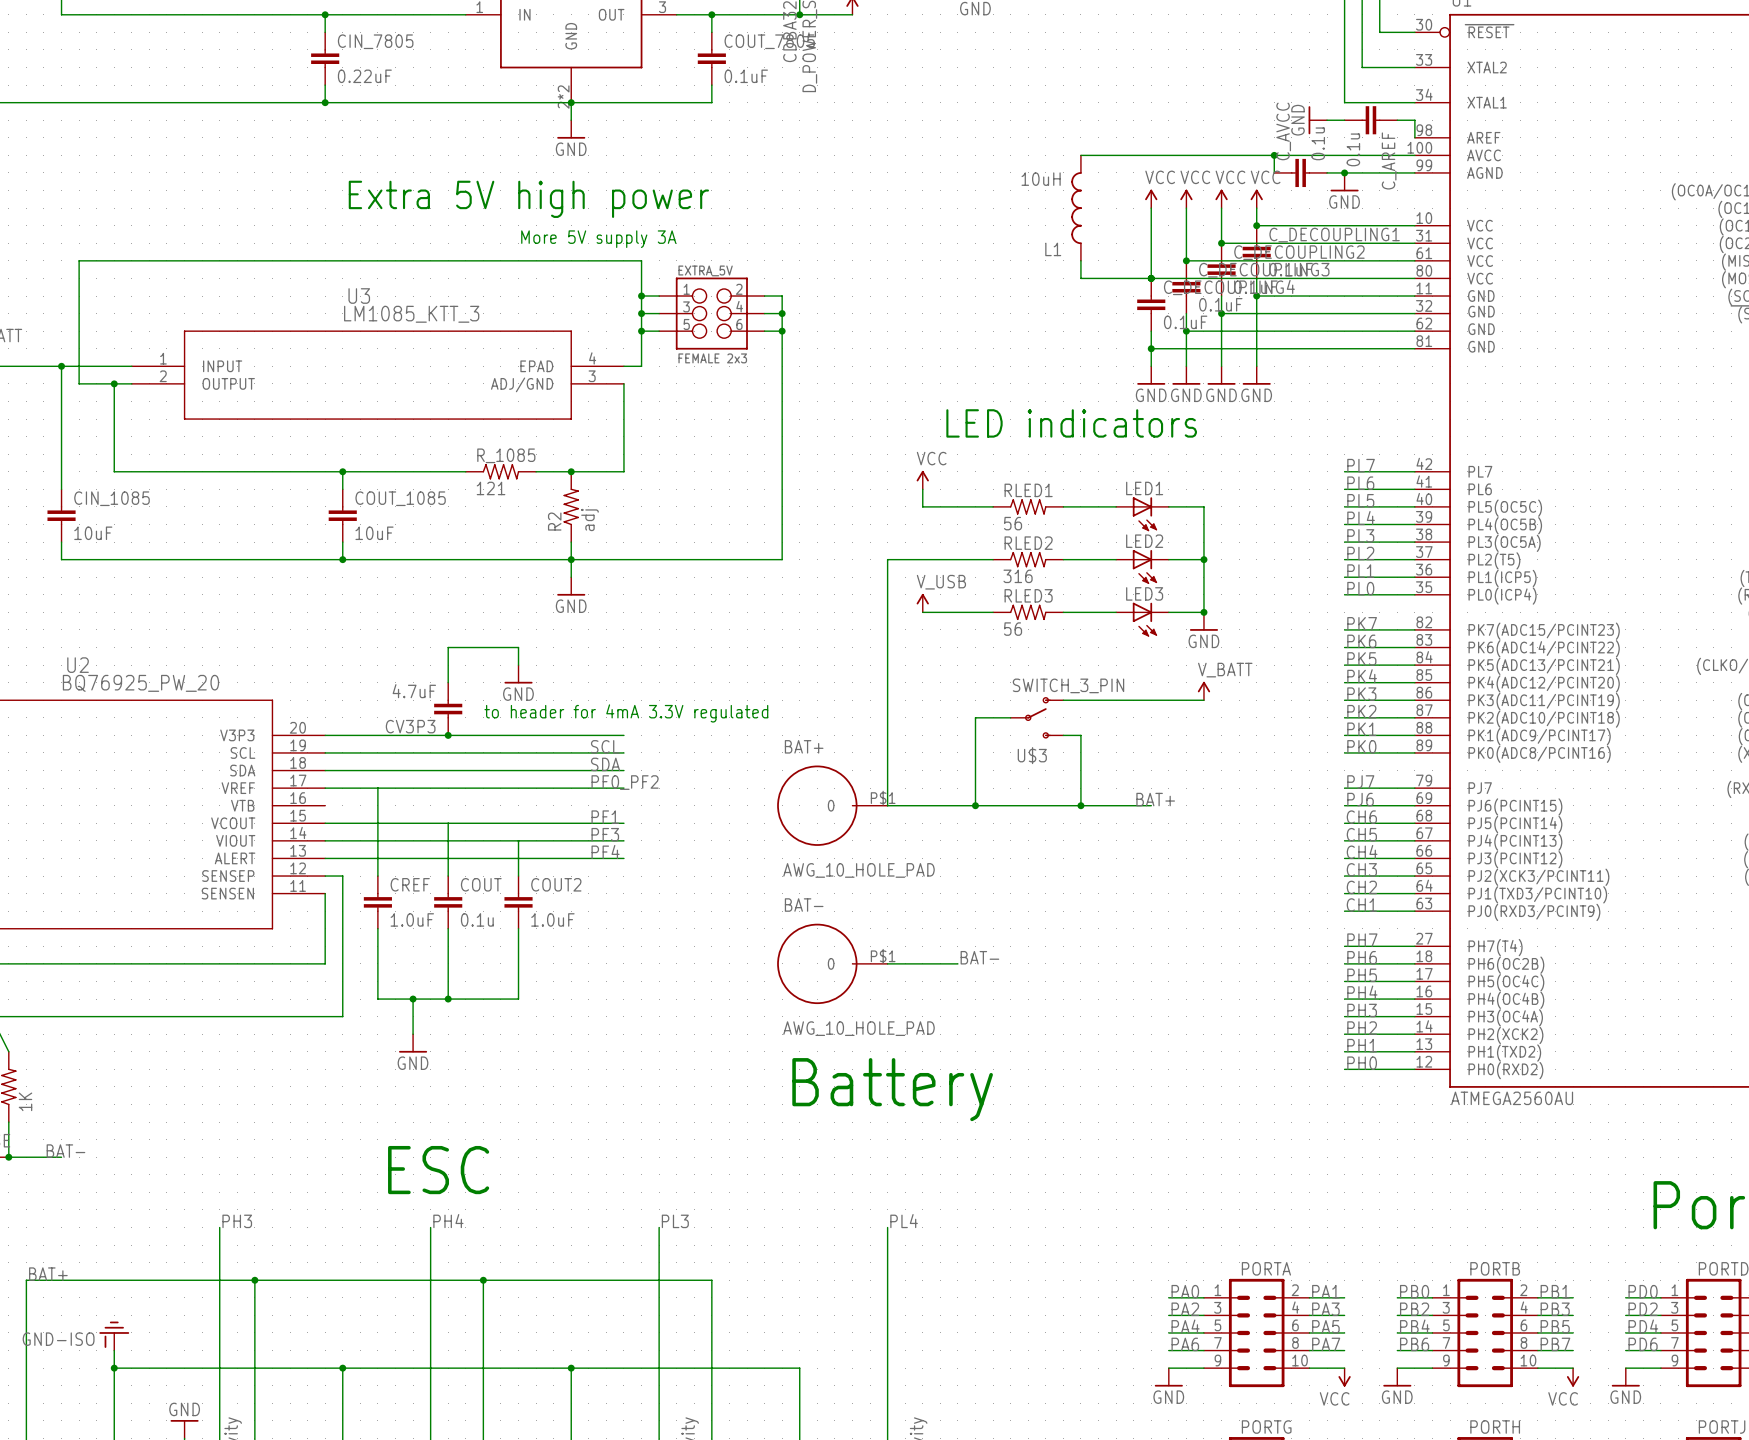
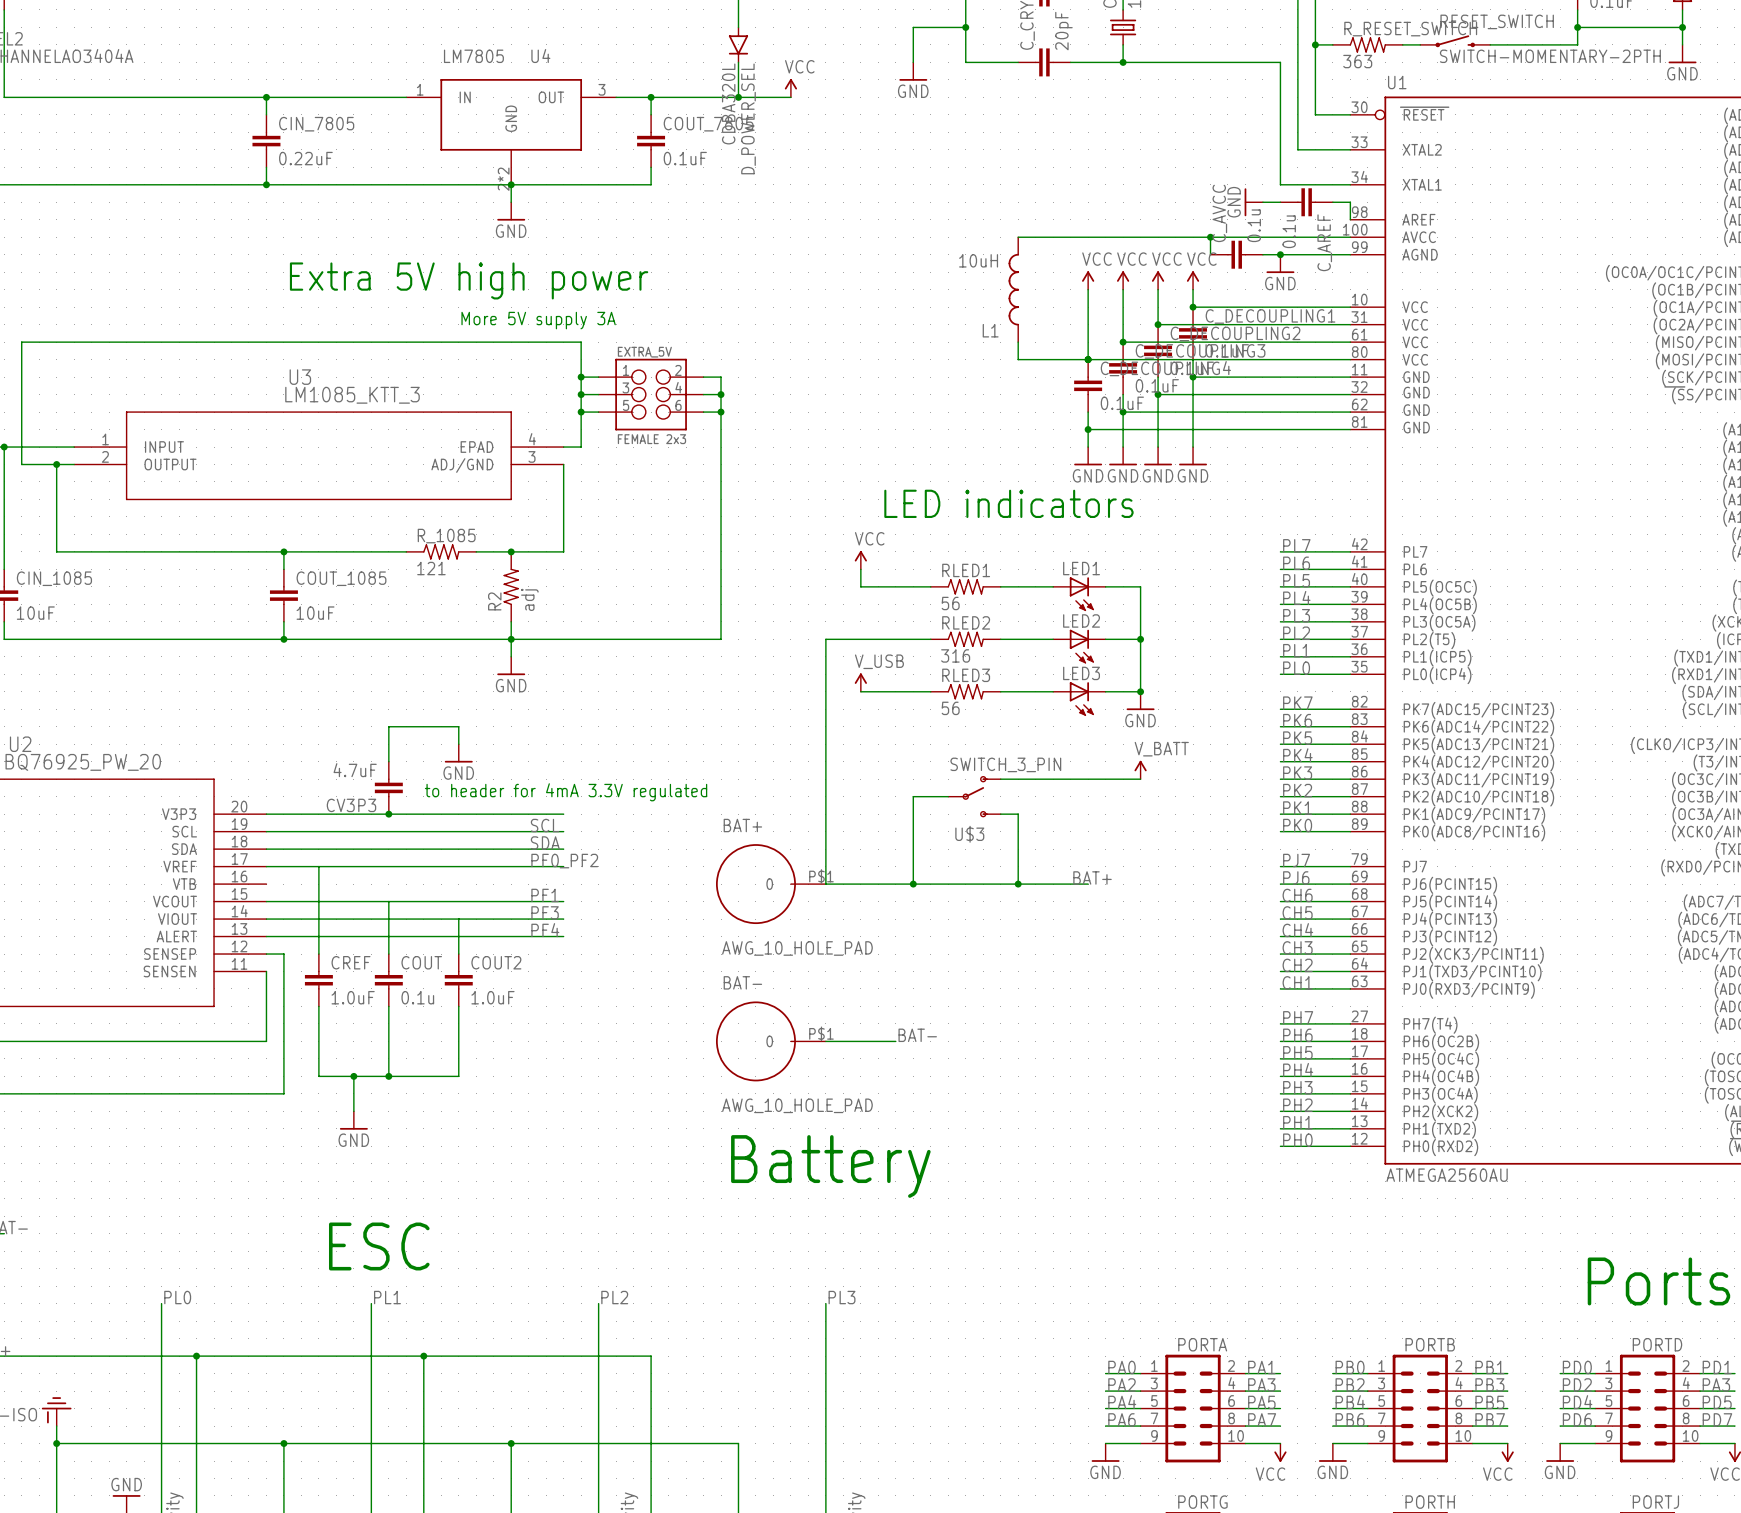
label: PH3 (237, 1221) -> PL0 (177, 1297)
label: PH4 (448, 1221) -> PL1 (387, 1297)
label: PL3 (675, 1221) -> PL2 (614, 1297)
label: PL4 (904, 1221) -> PL3 (842, 1297)

